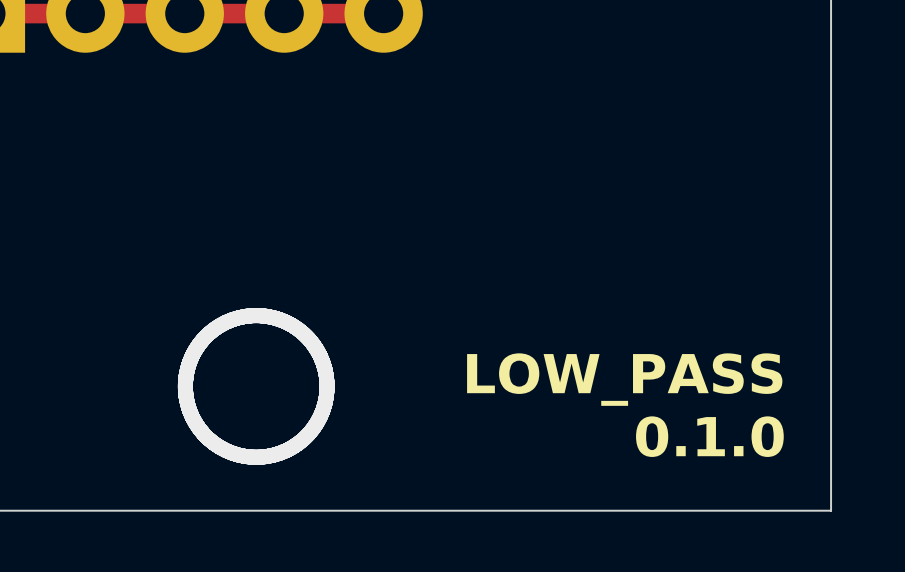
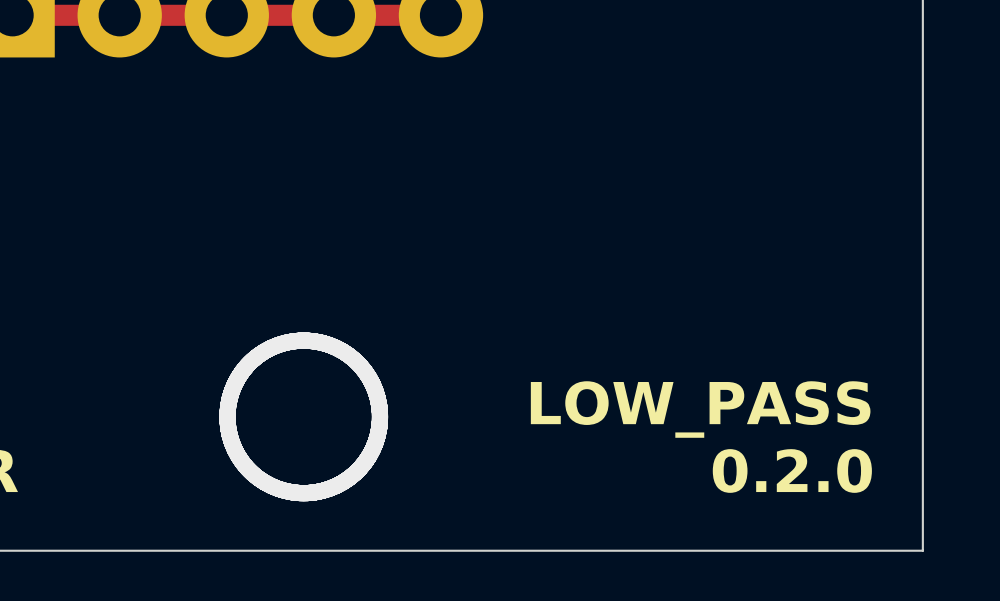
text: 0.1.0 (709, 436) -> 0.2.0 (792, 470)

